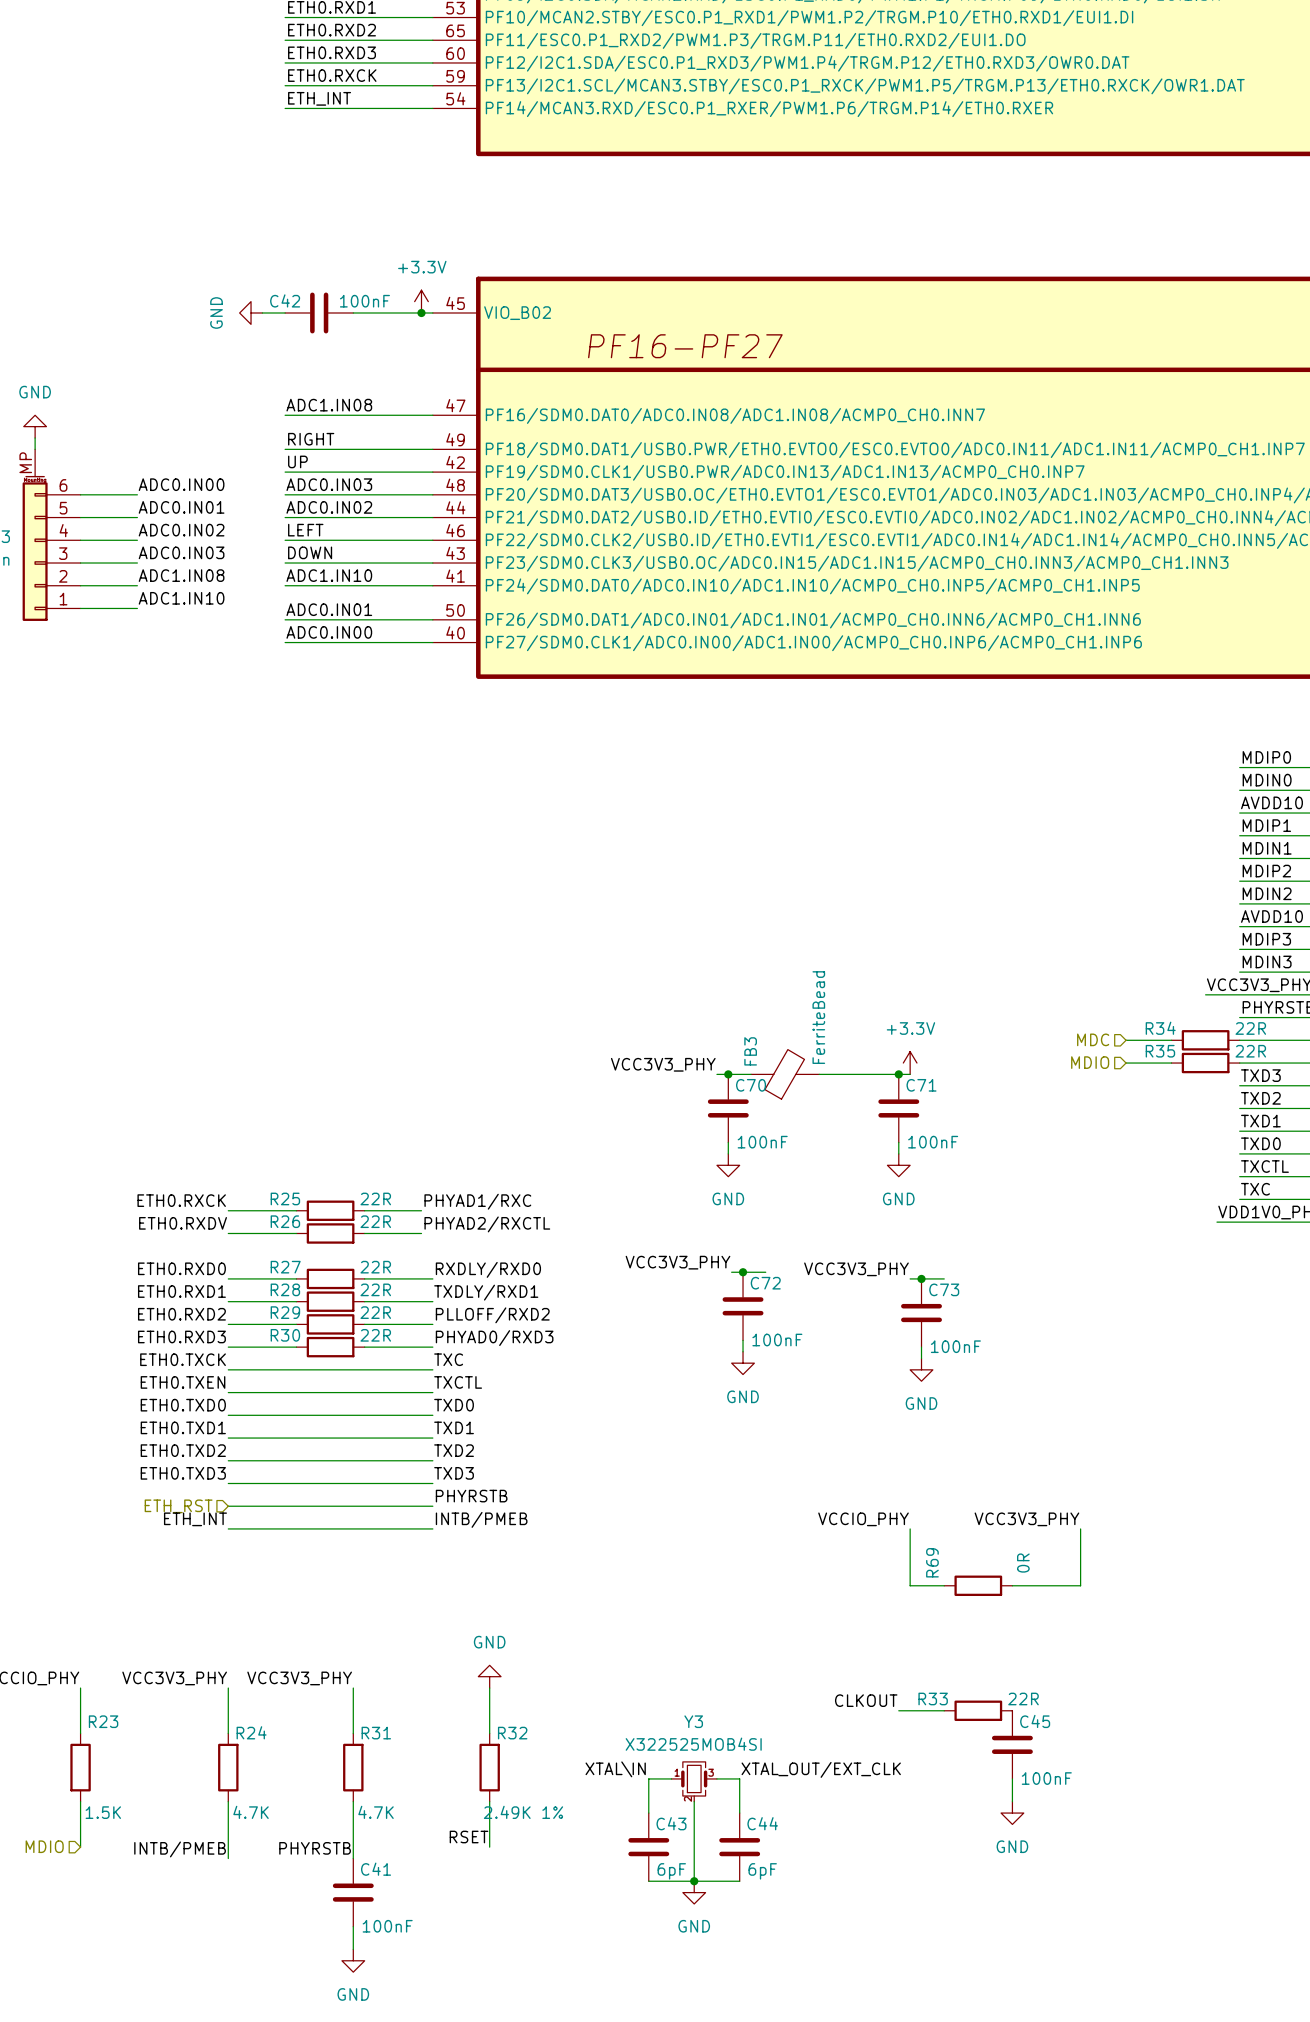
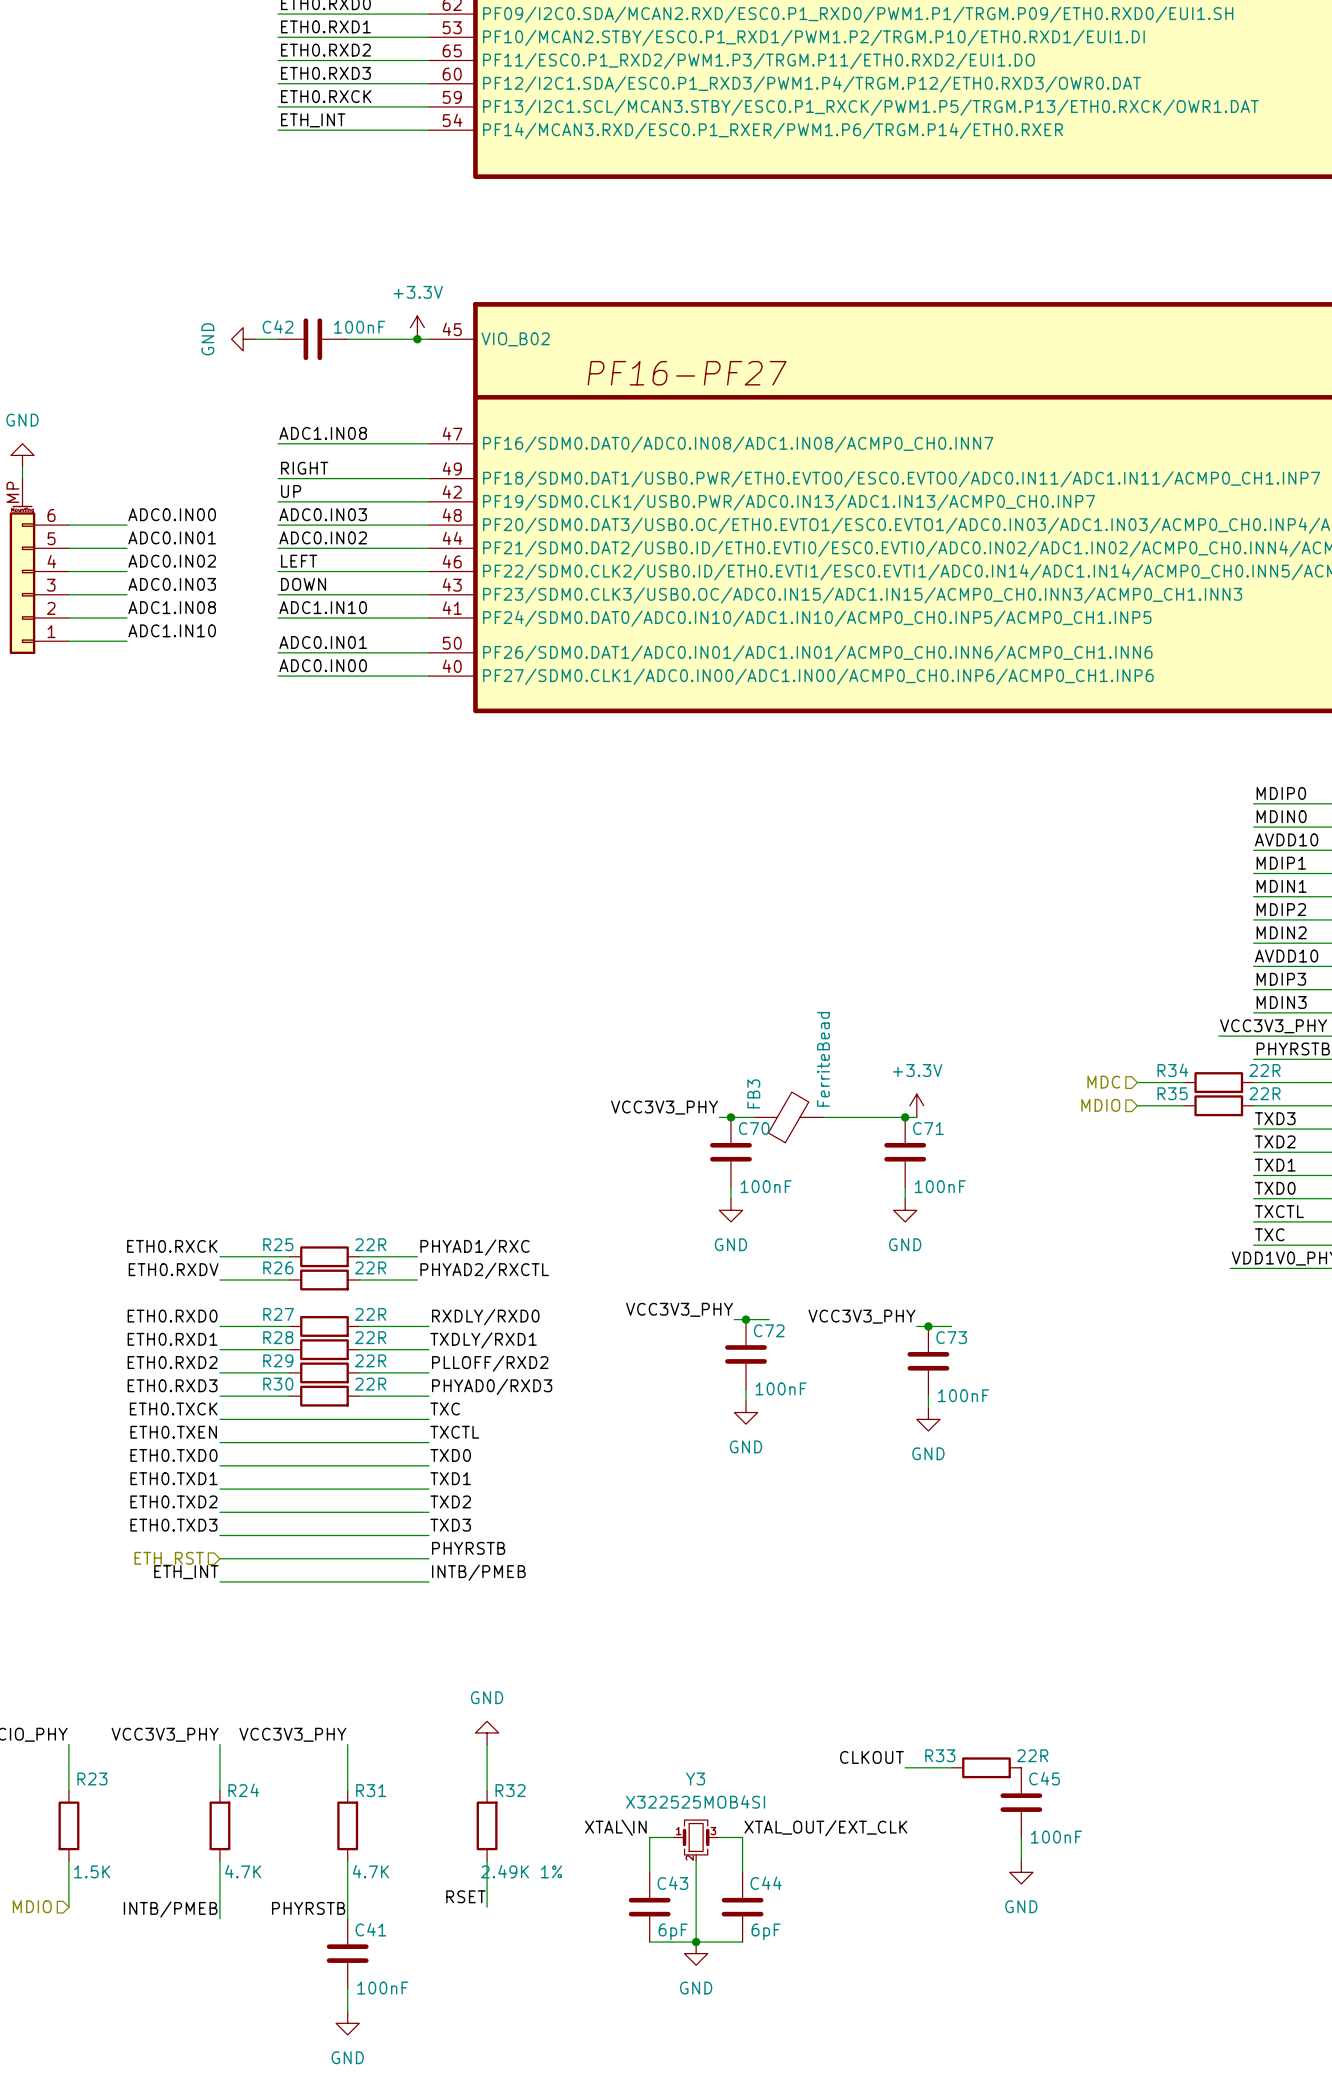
label: VCCIO_PHY (863, 1519) -> none
label: VCC3V3_PHY (1026, 1519) -> none
wire: (910, 1528) (910, 1585) (944, 1585) -> none
wire: (1080, 1528) (1080, 1585) (1012, 1585) -> none
R69: 0R (978, 1585) -> none

